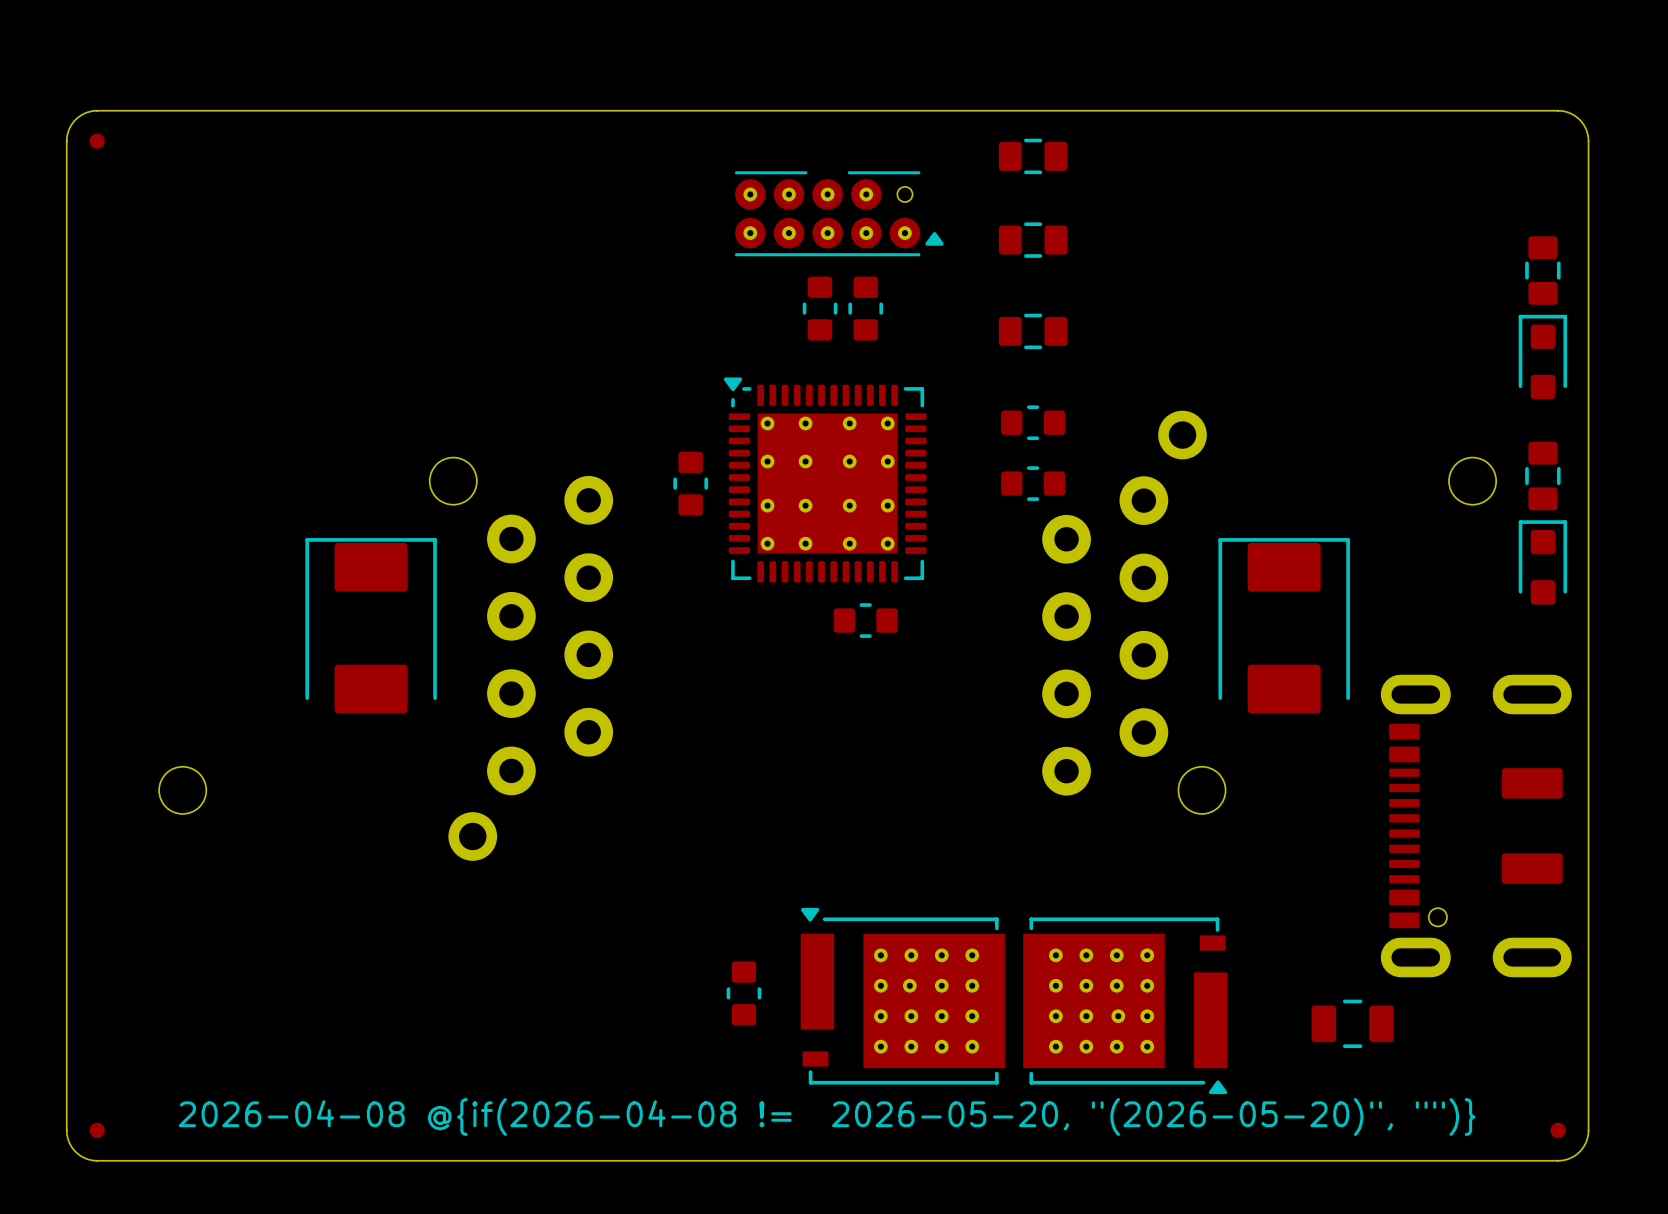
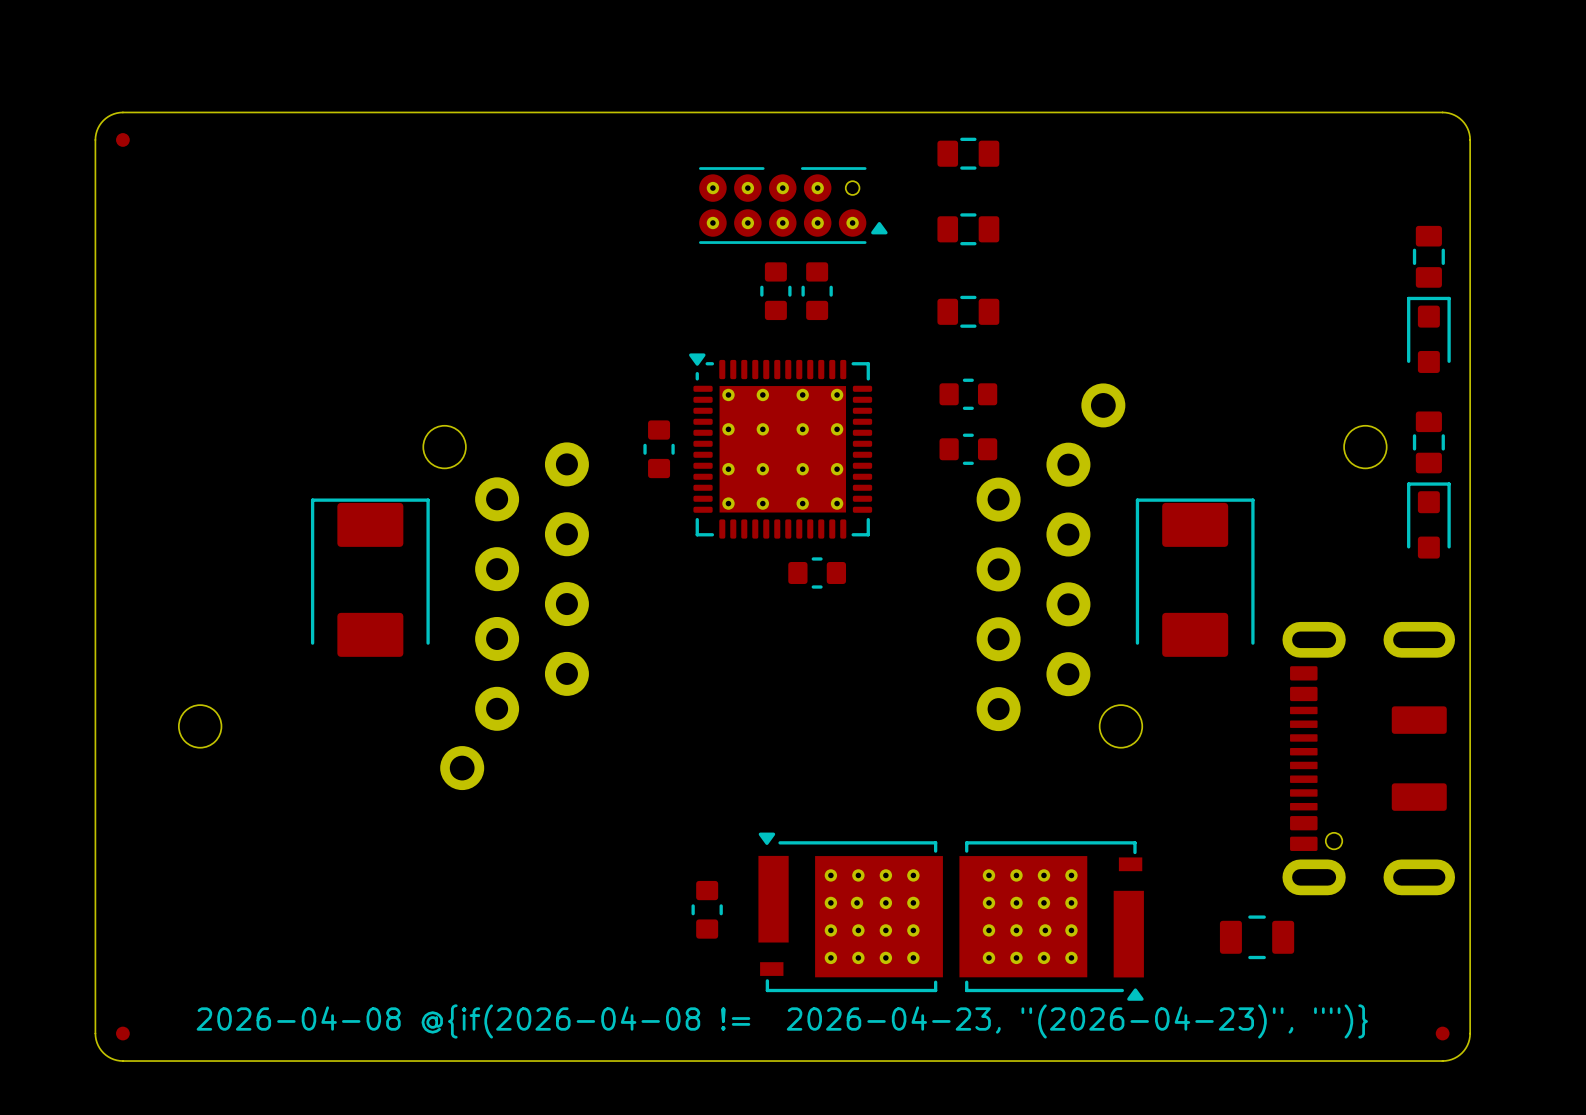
drawing shape: [178, 1098, 1476, 1136] -> [196, 1004, 1368, 1039]

